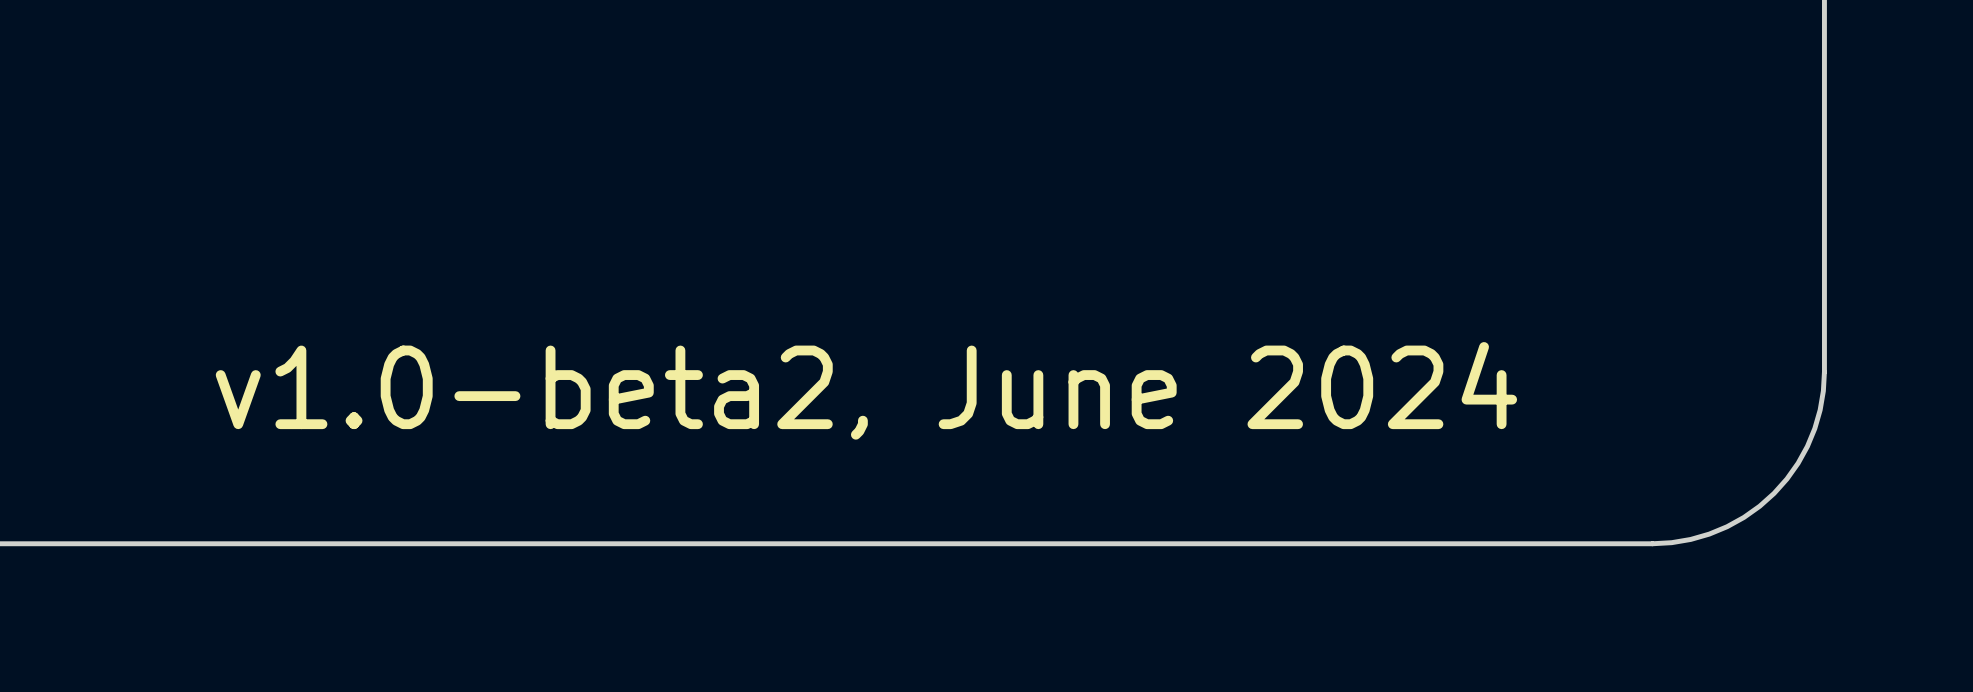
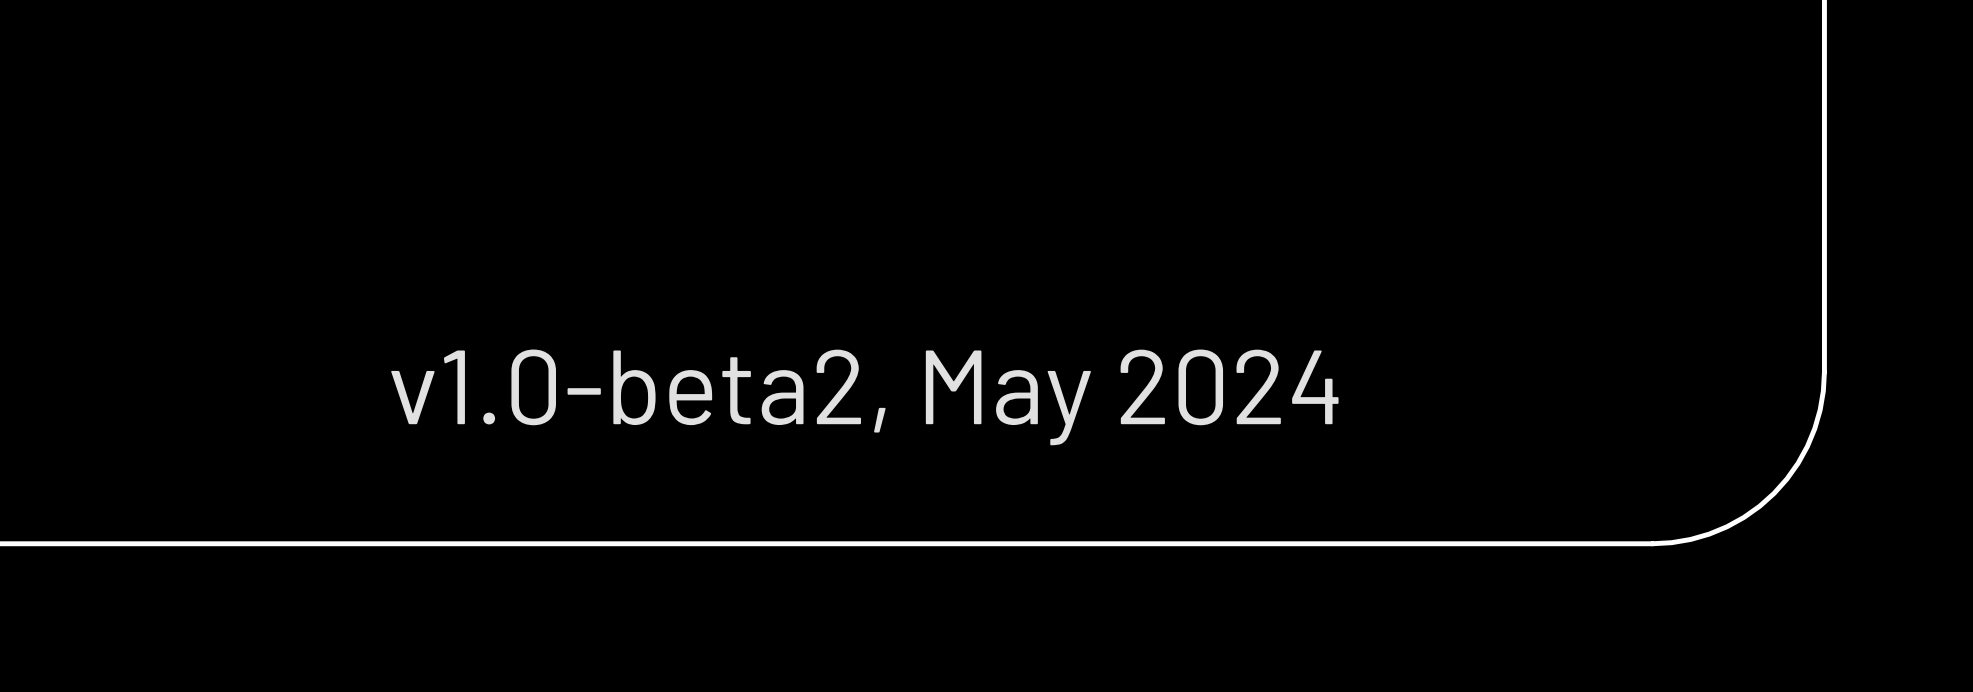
text: v1.0-beta2, June 2024 (866, 390) -> v1.0-beta2, May 2024 (864, 397)

